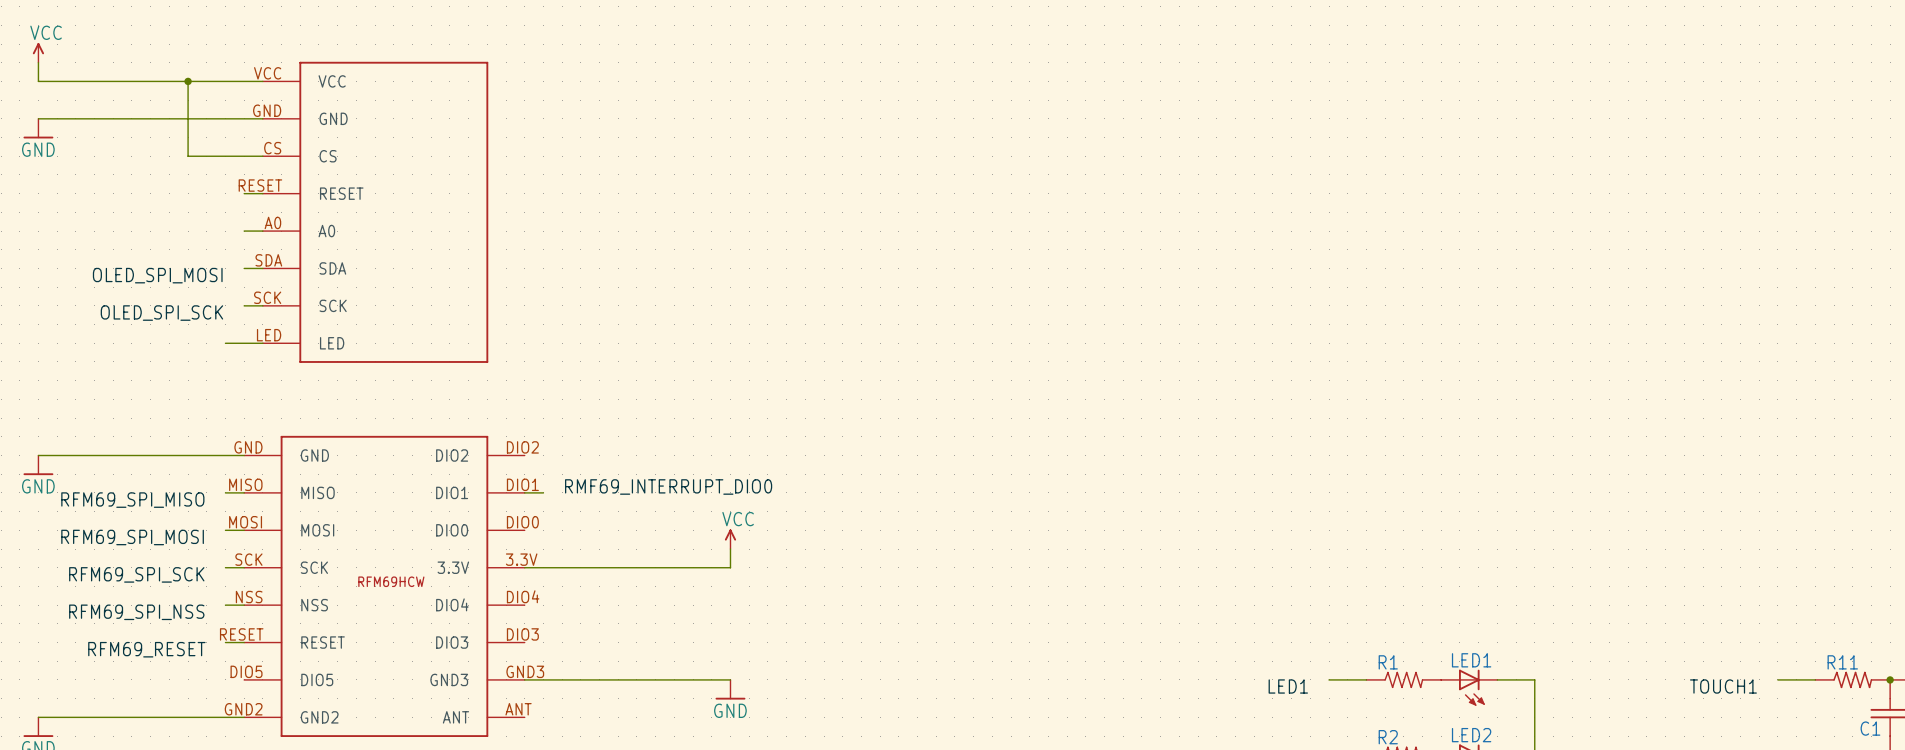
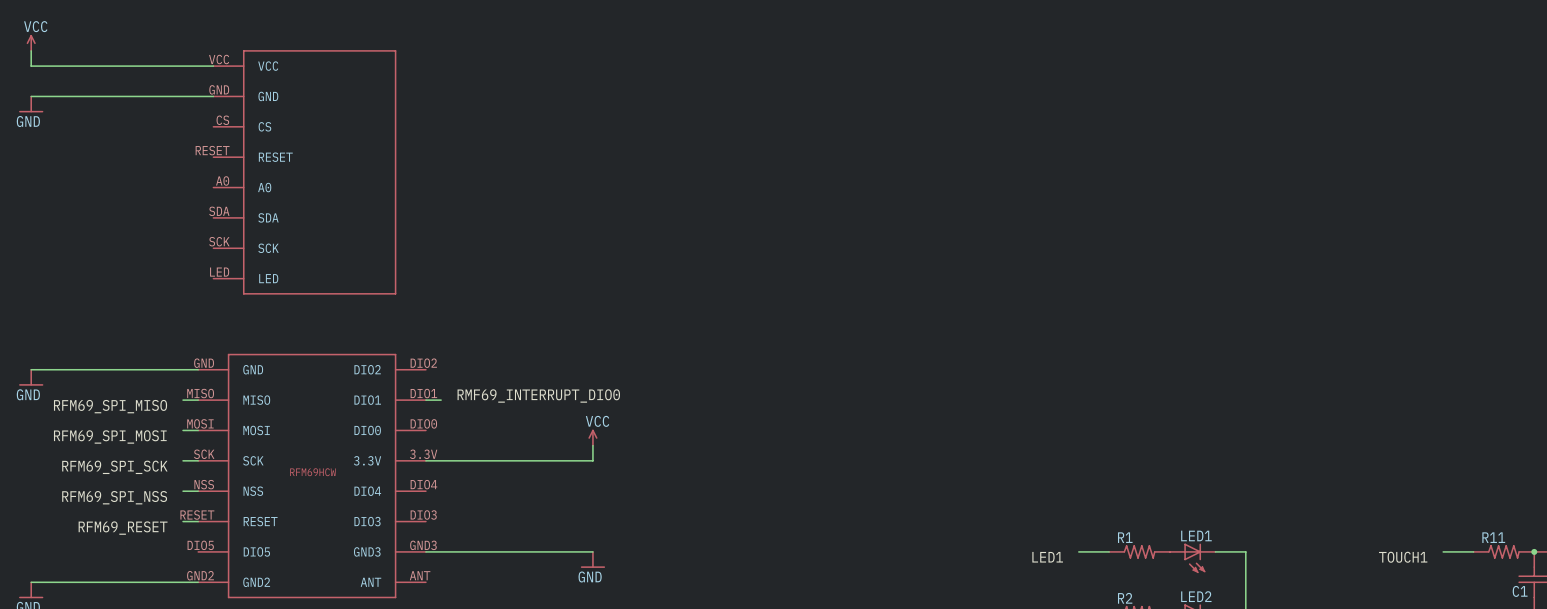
wire: (188, 81) (188, 156) (262, 156) -> none
junction: (188, 81) -> none
wire: (244, 193) (262, 193) -> none
wire: (244, 231) (262, 231) -> none
wire: (244, 268) (262, 268) -> none
label: OLED_SPI_MOSI (157, 275) -> none
wire: (244, 305) (262, 305) -> none
label: OLED_SPI_SCK (161, 313) -> none
wire: (225, 343) (262, 343) -> none

